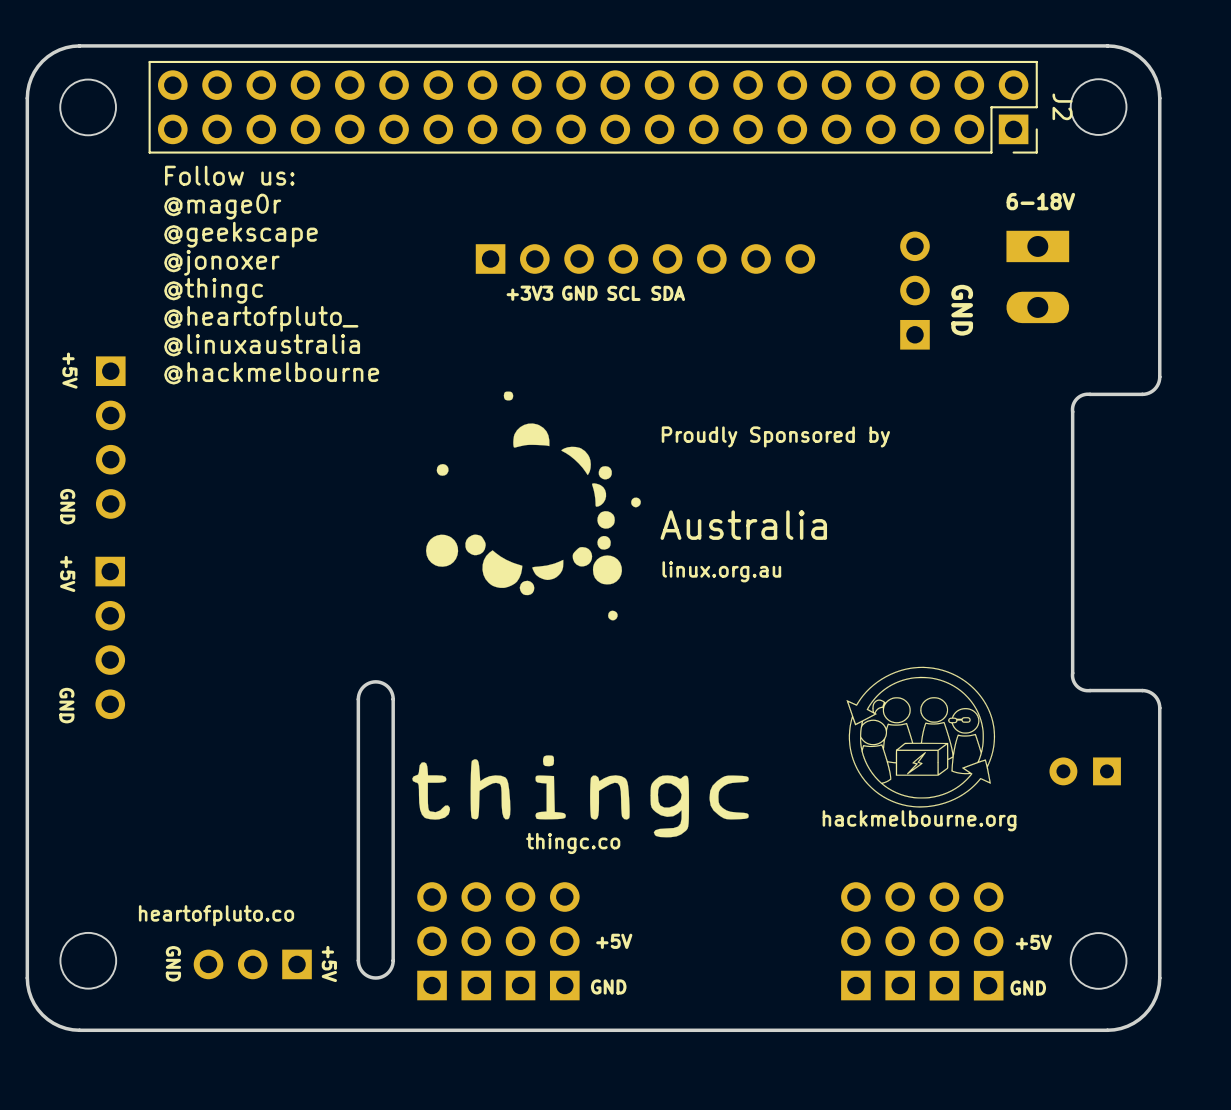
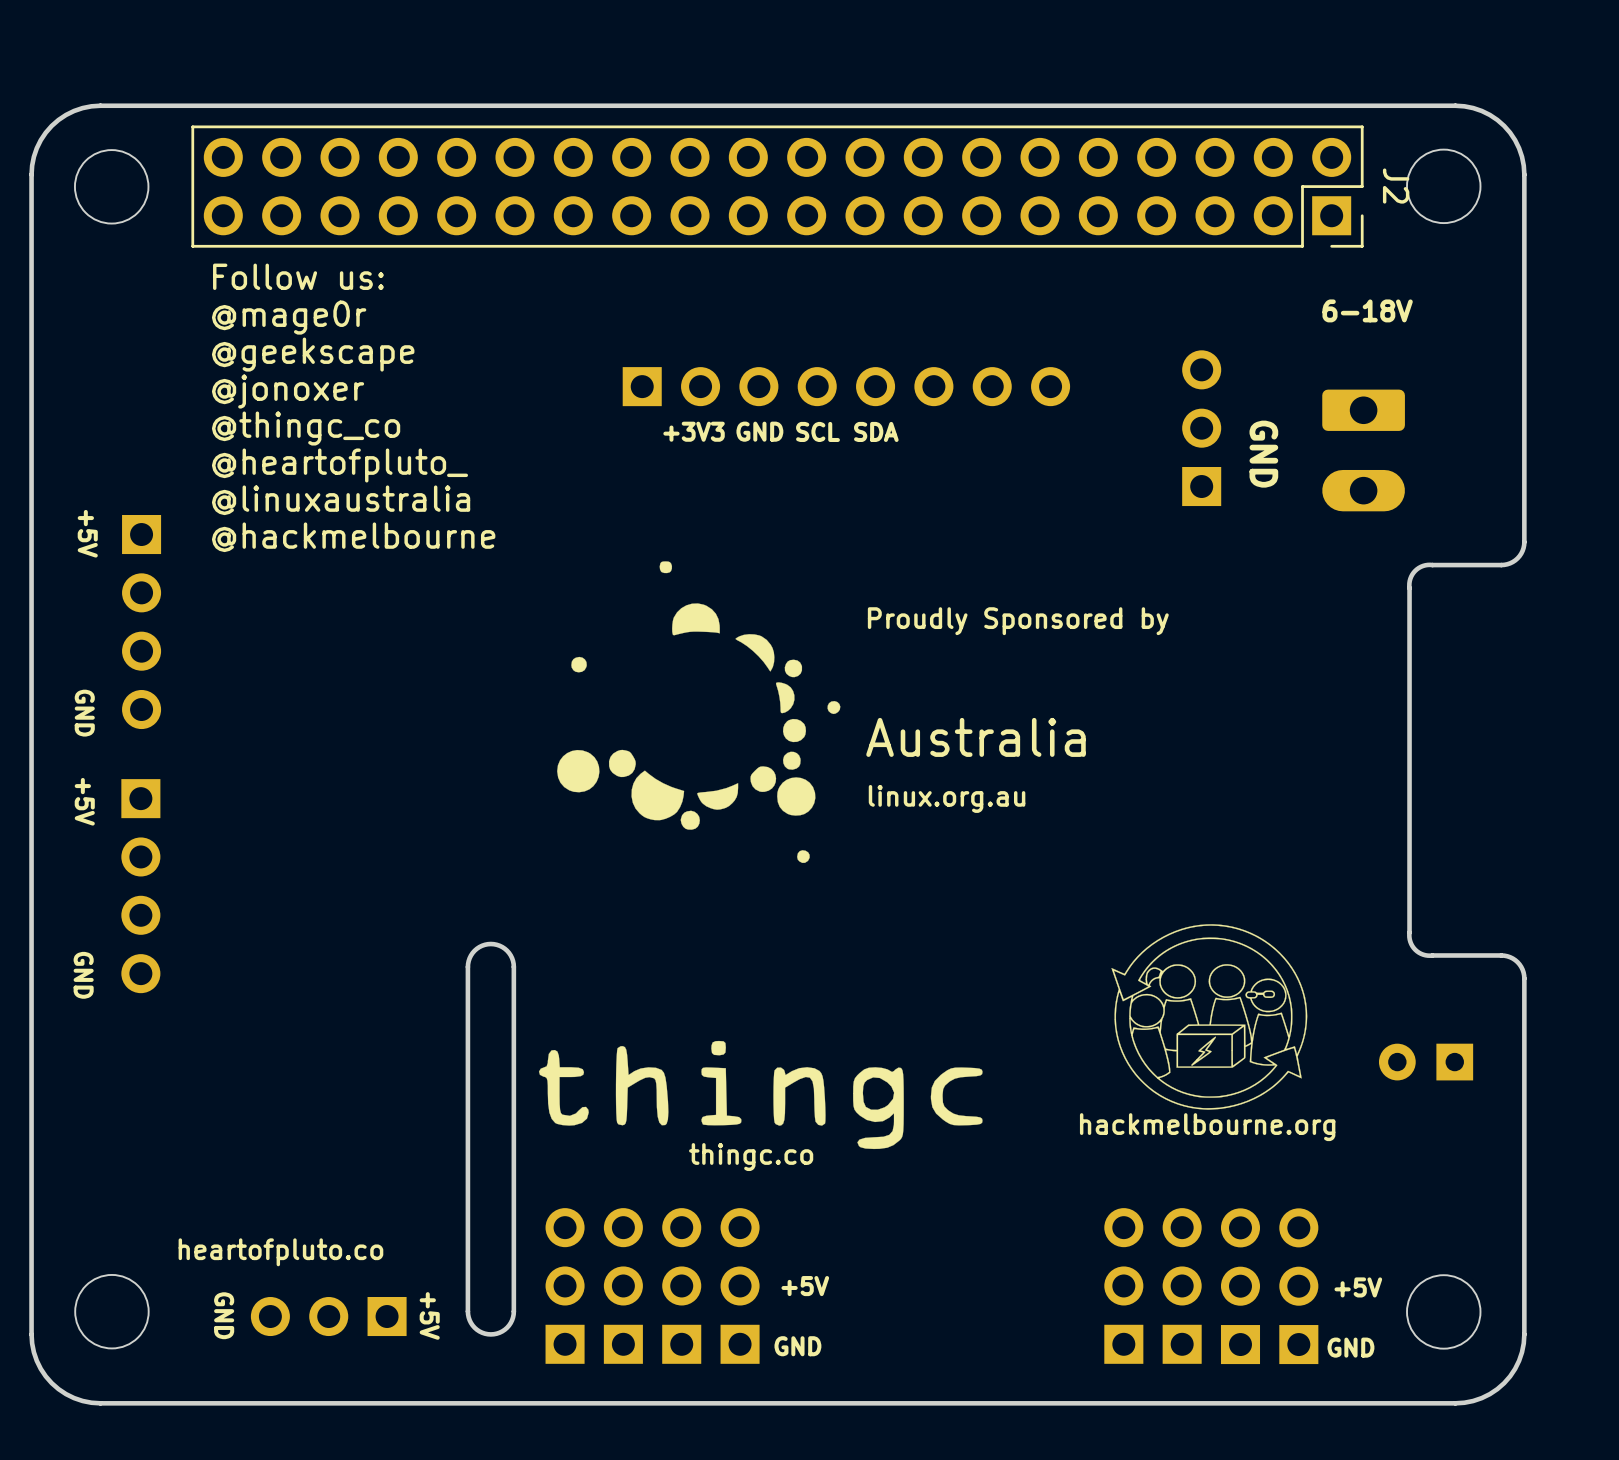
part: (1037, 276) -> none
text: @thingc (213, 290) -> @thingc_co (306, 428)
part: none -> (1363, 450)

